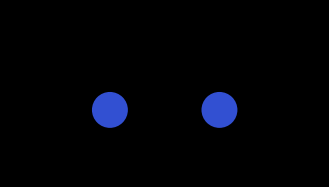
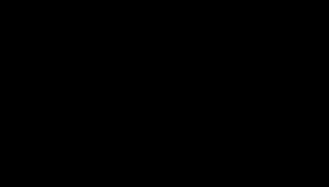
part: (109, 109) -> none
part: (219, 109) -> none

